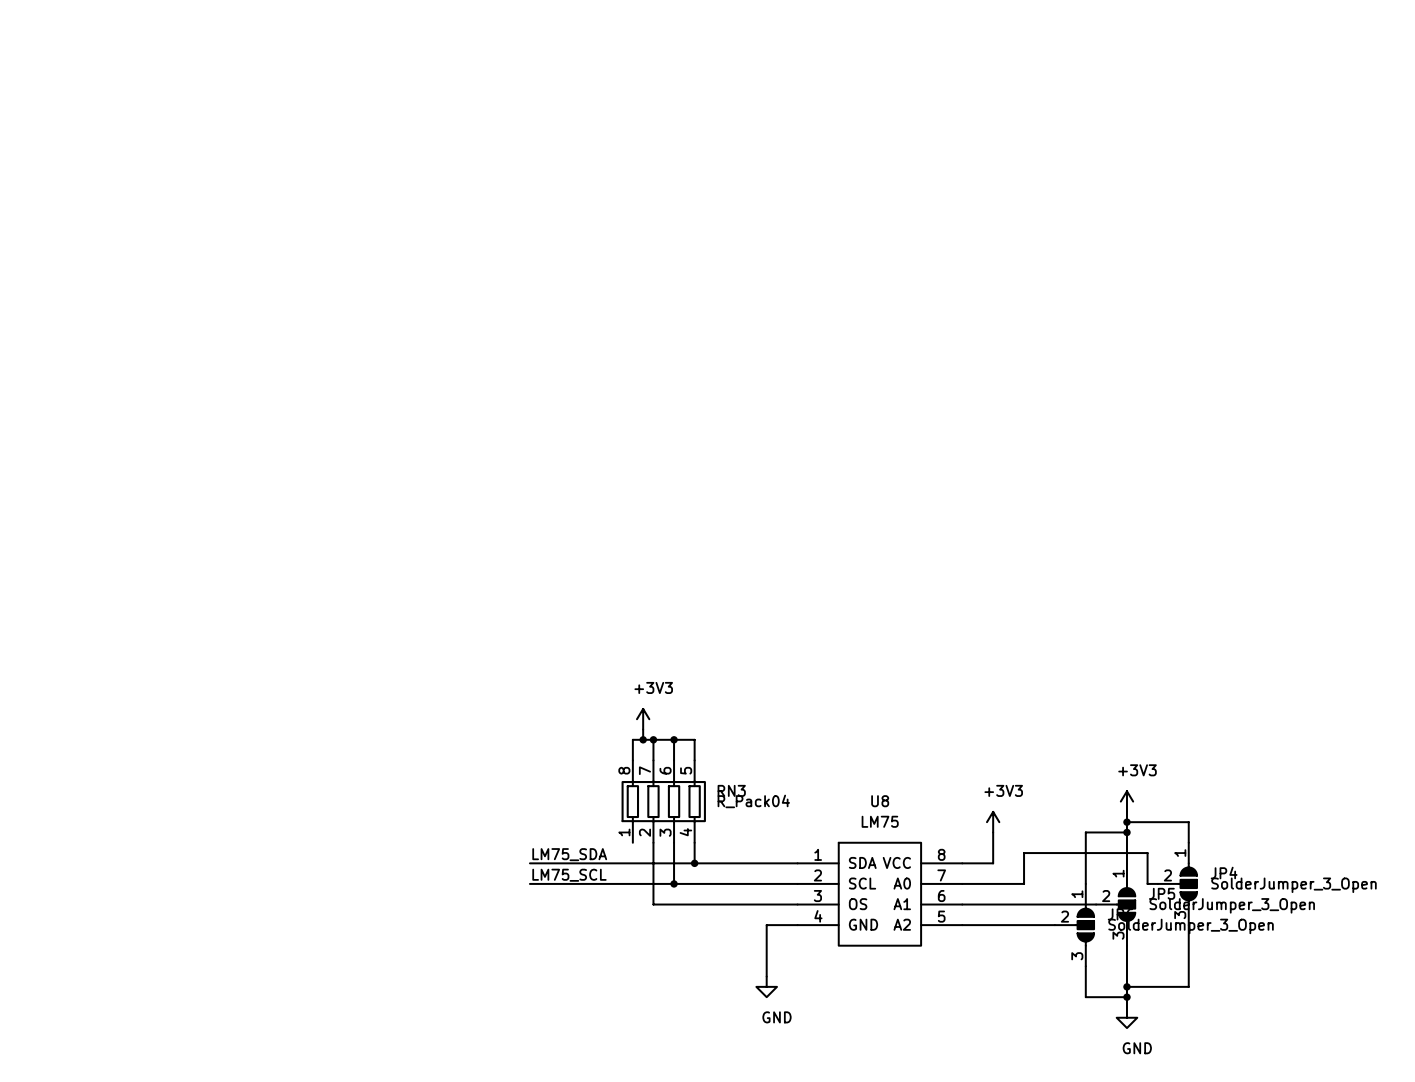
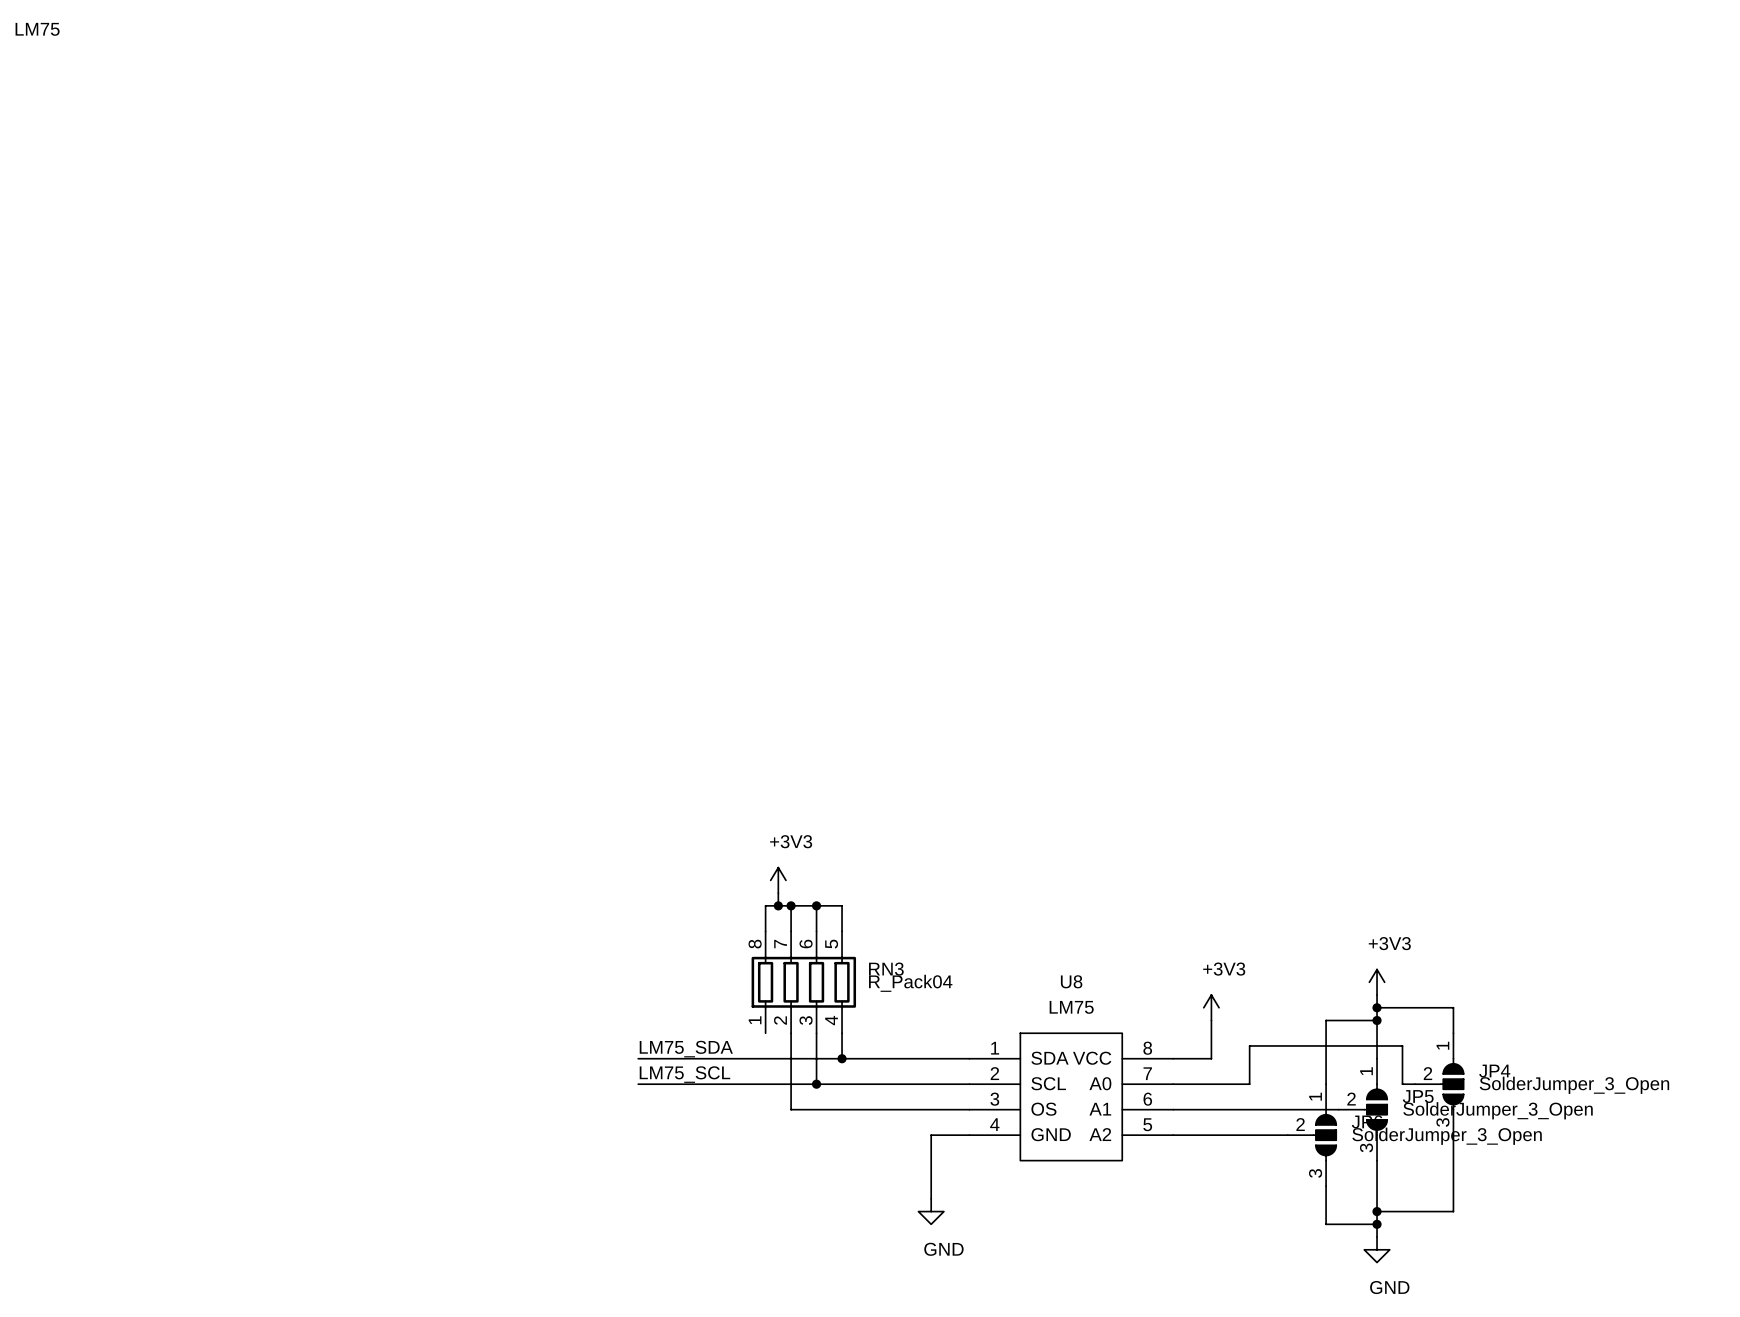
text: none -> LM75 (37, 29)

